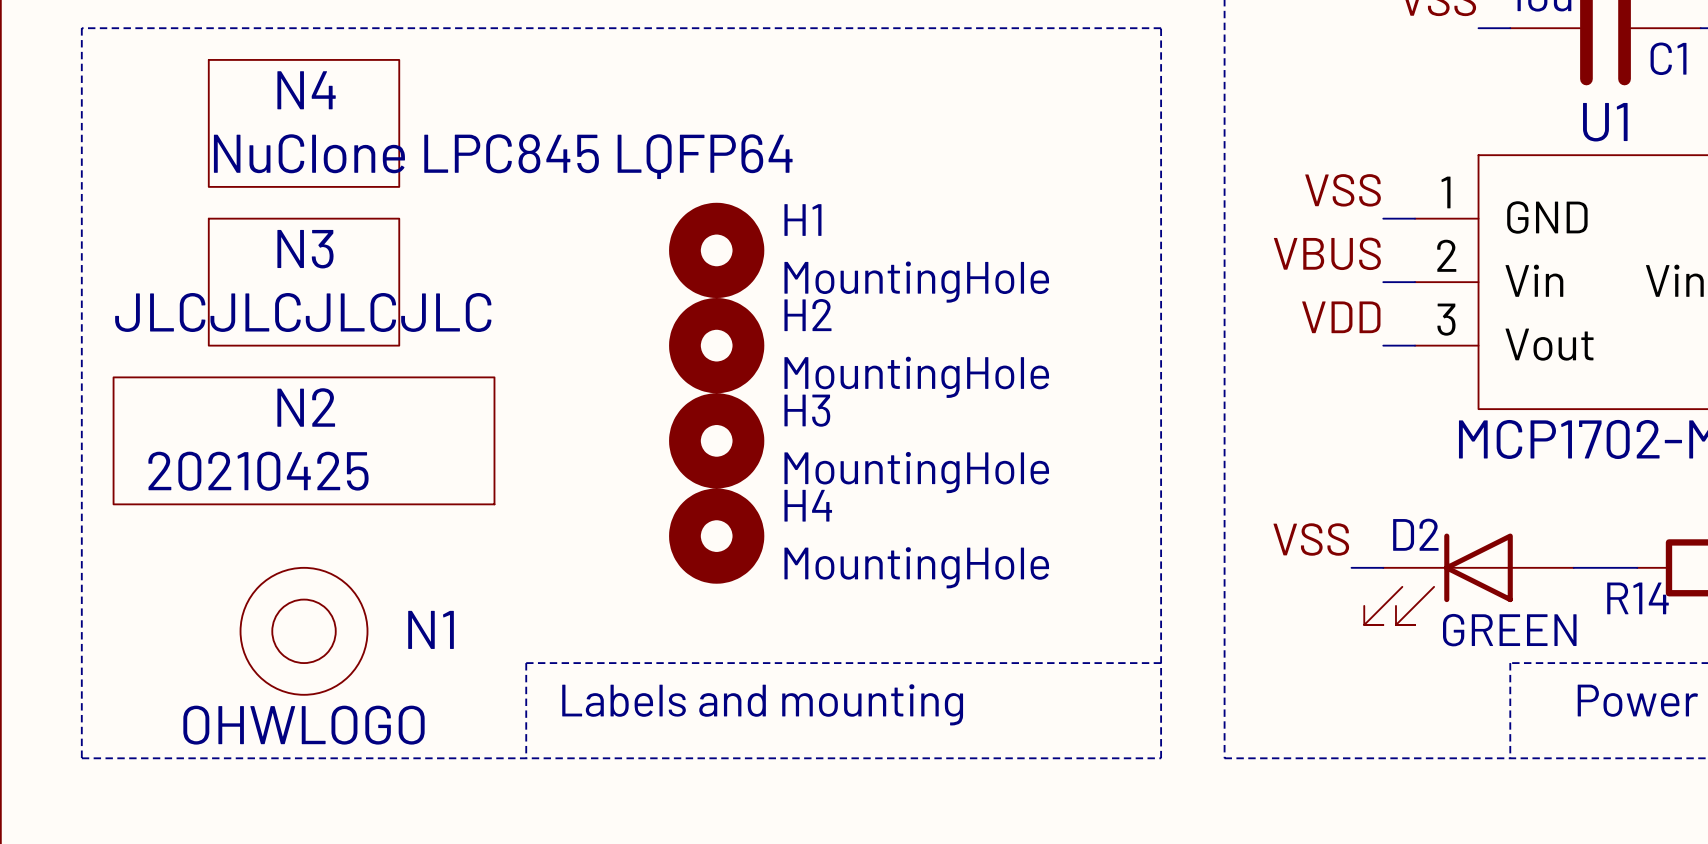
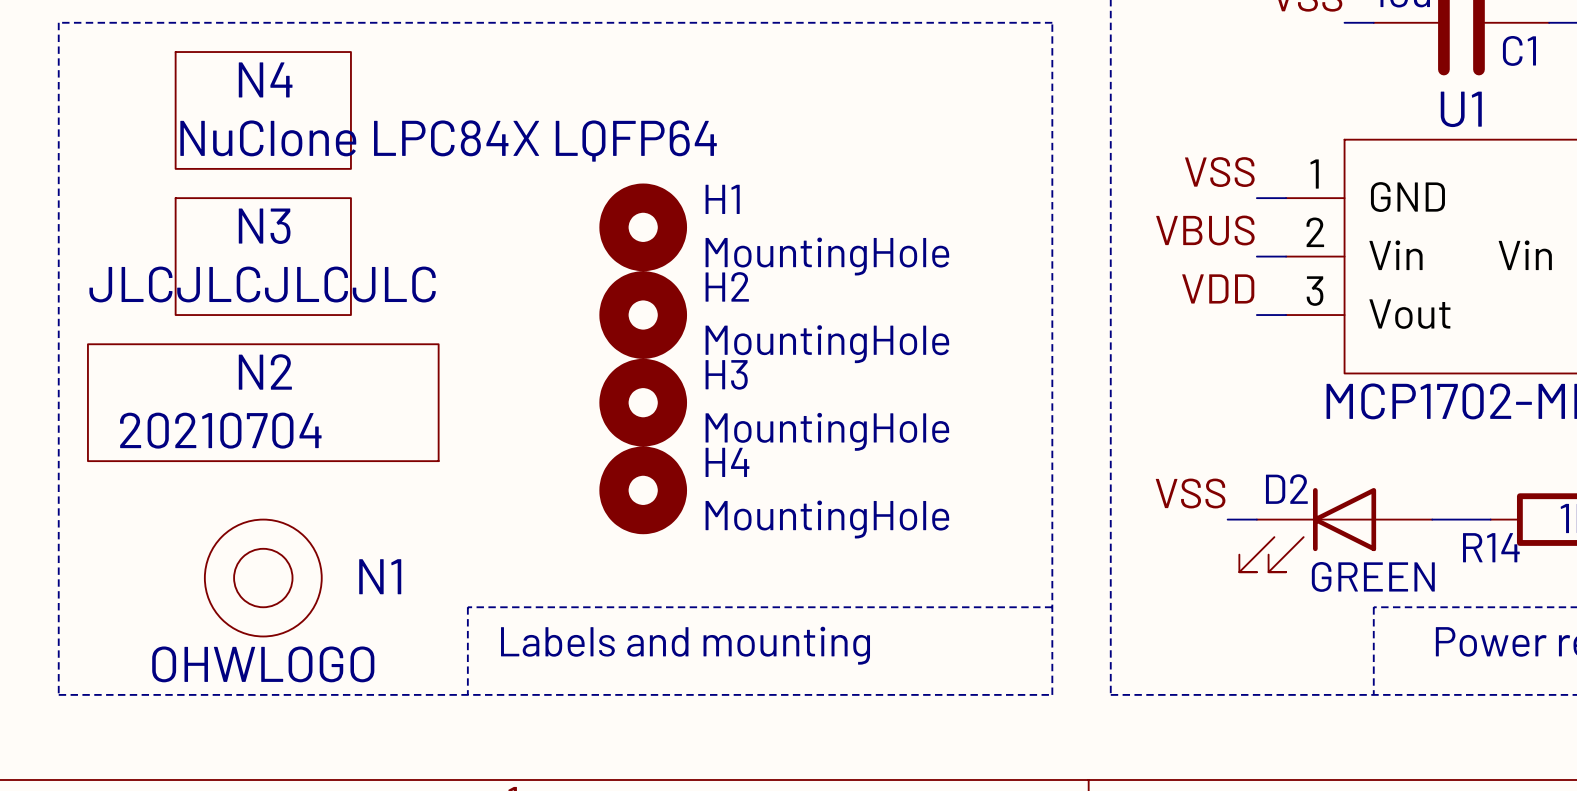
N4 value: NuClone LPC845 LQFP64 (503, 156) -> NuClone LPC84X LQFP64 (448, 141)
N2 value: 20210425 (258, 471) -> 20210704 (220, 430)

